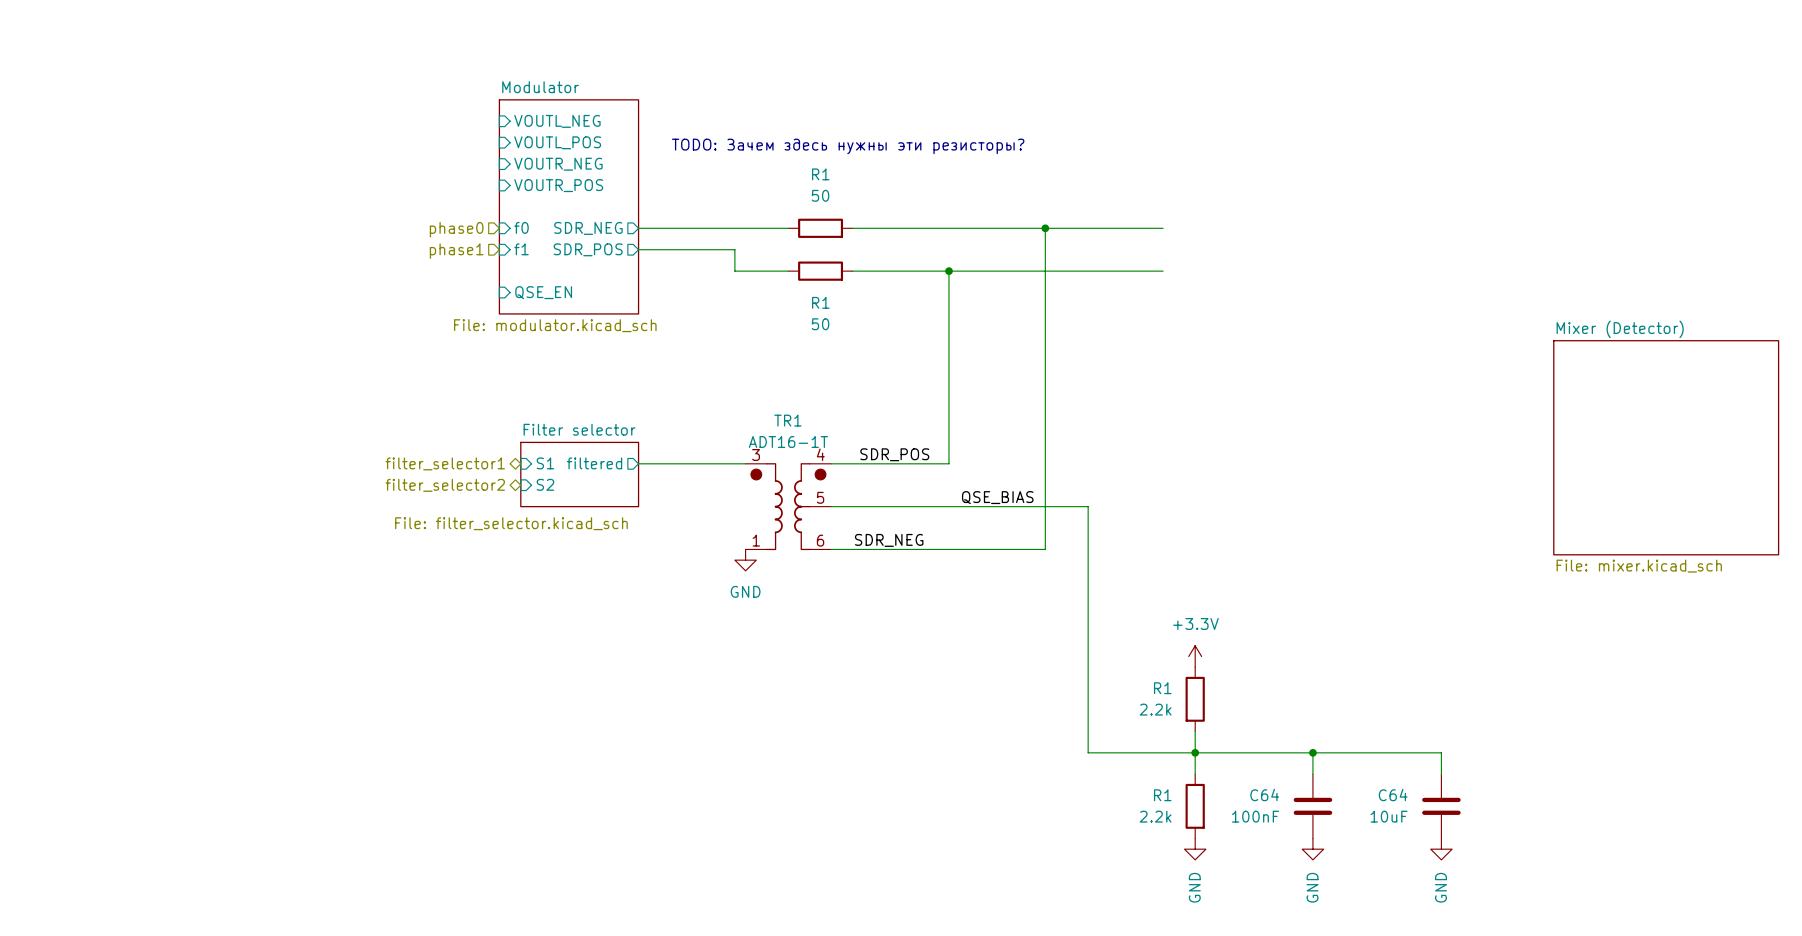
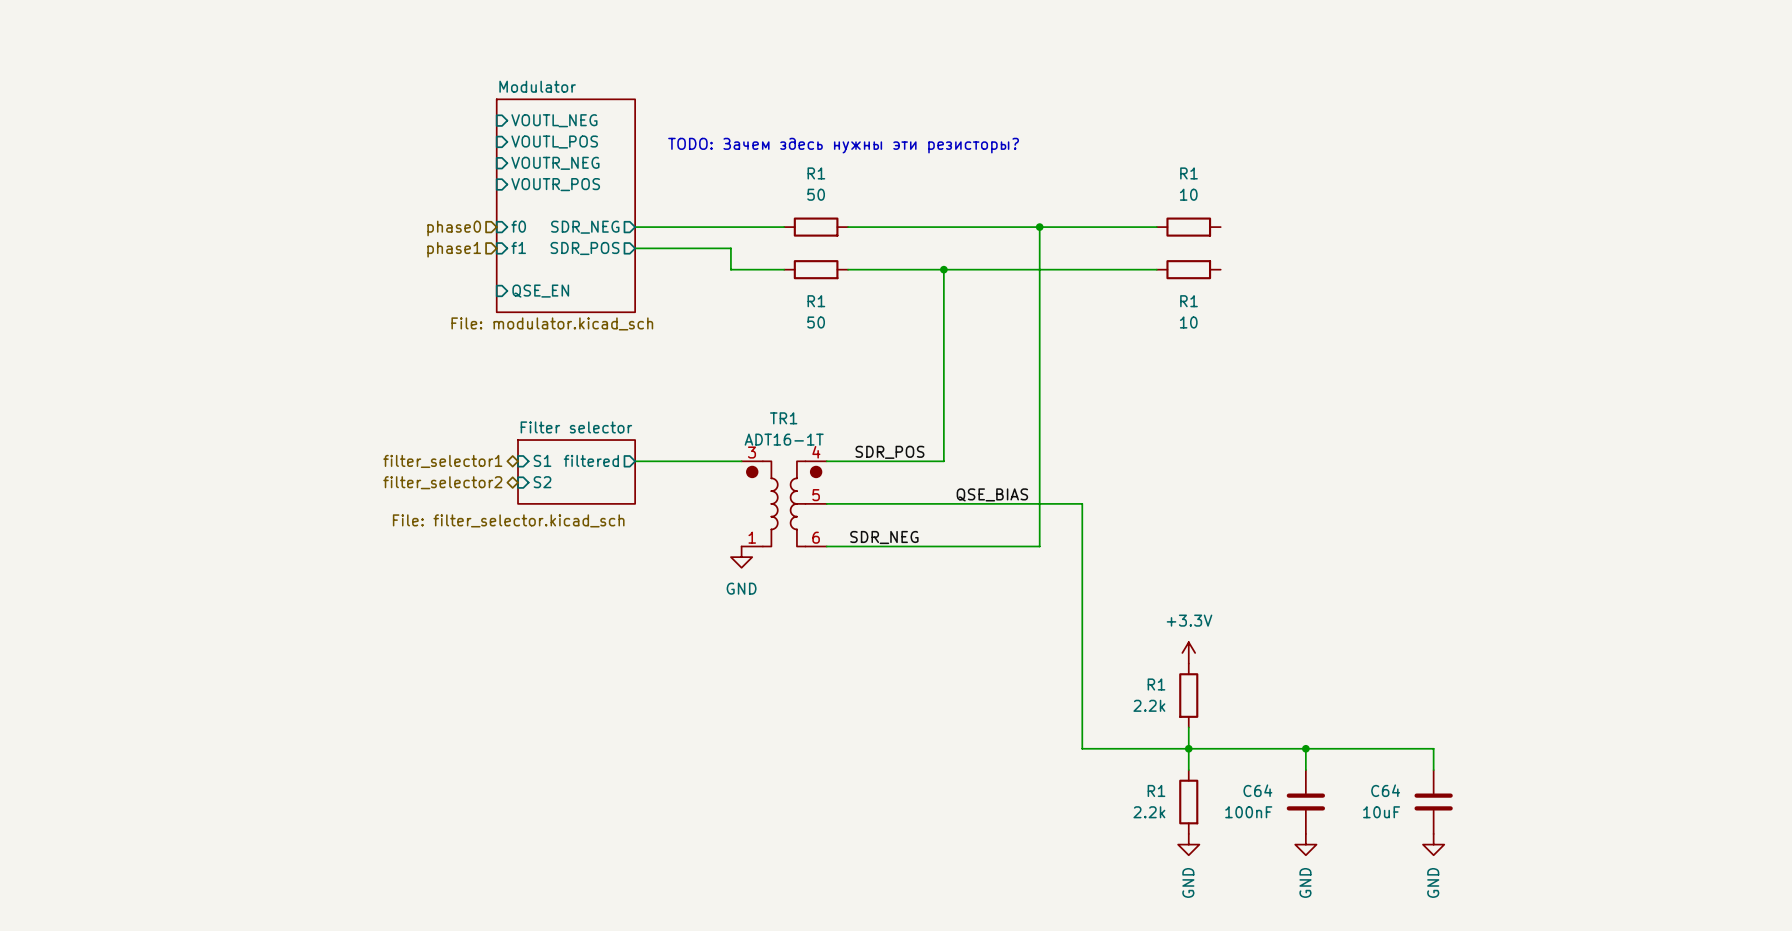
R1: none -> 10 (1188, 227)
R1: none -> 10 (1188, 269)
sheet Mixer (Detector): File: mixer.kicad_sch (1666, 447) -> none

